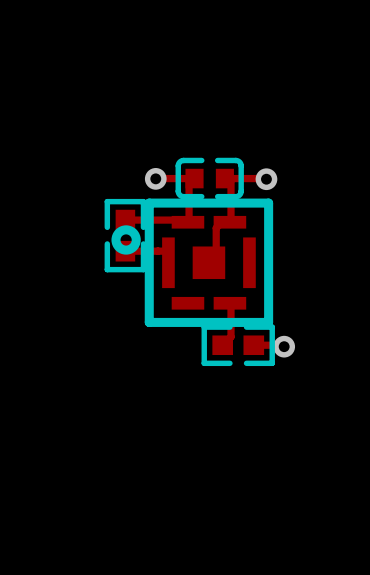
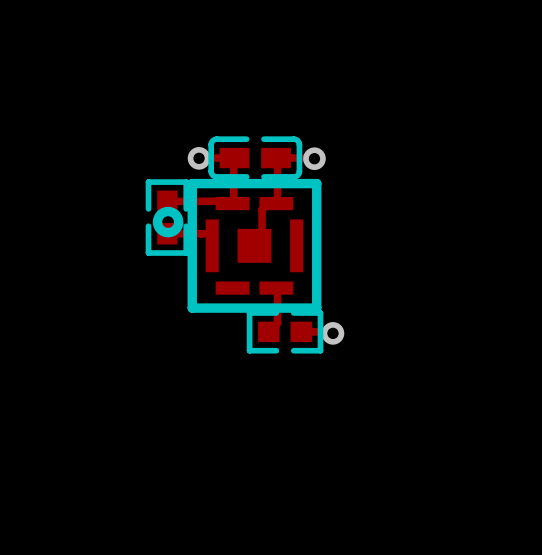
part footprint: [175, 157, 244, 200] -> [208, 136, 303, 180]

